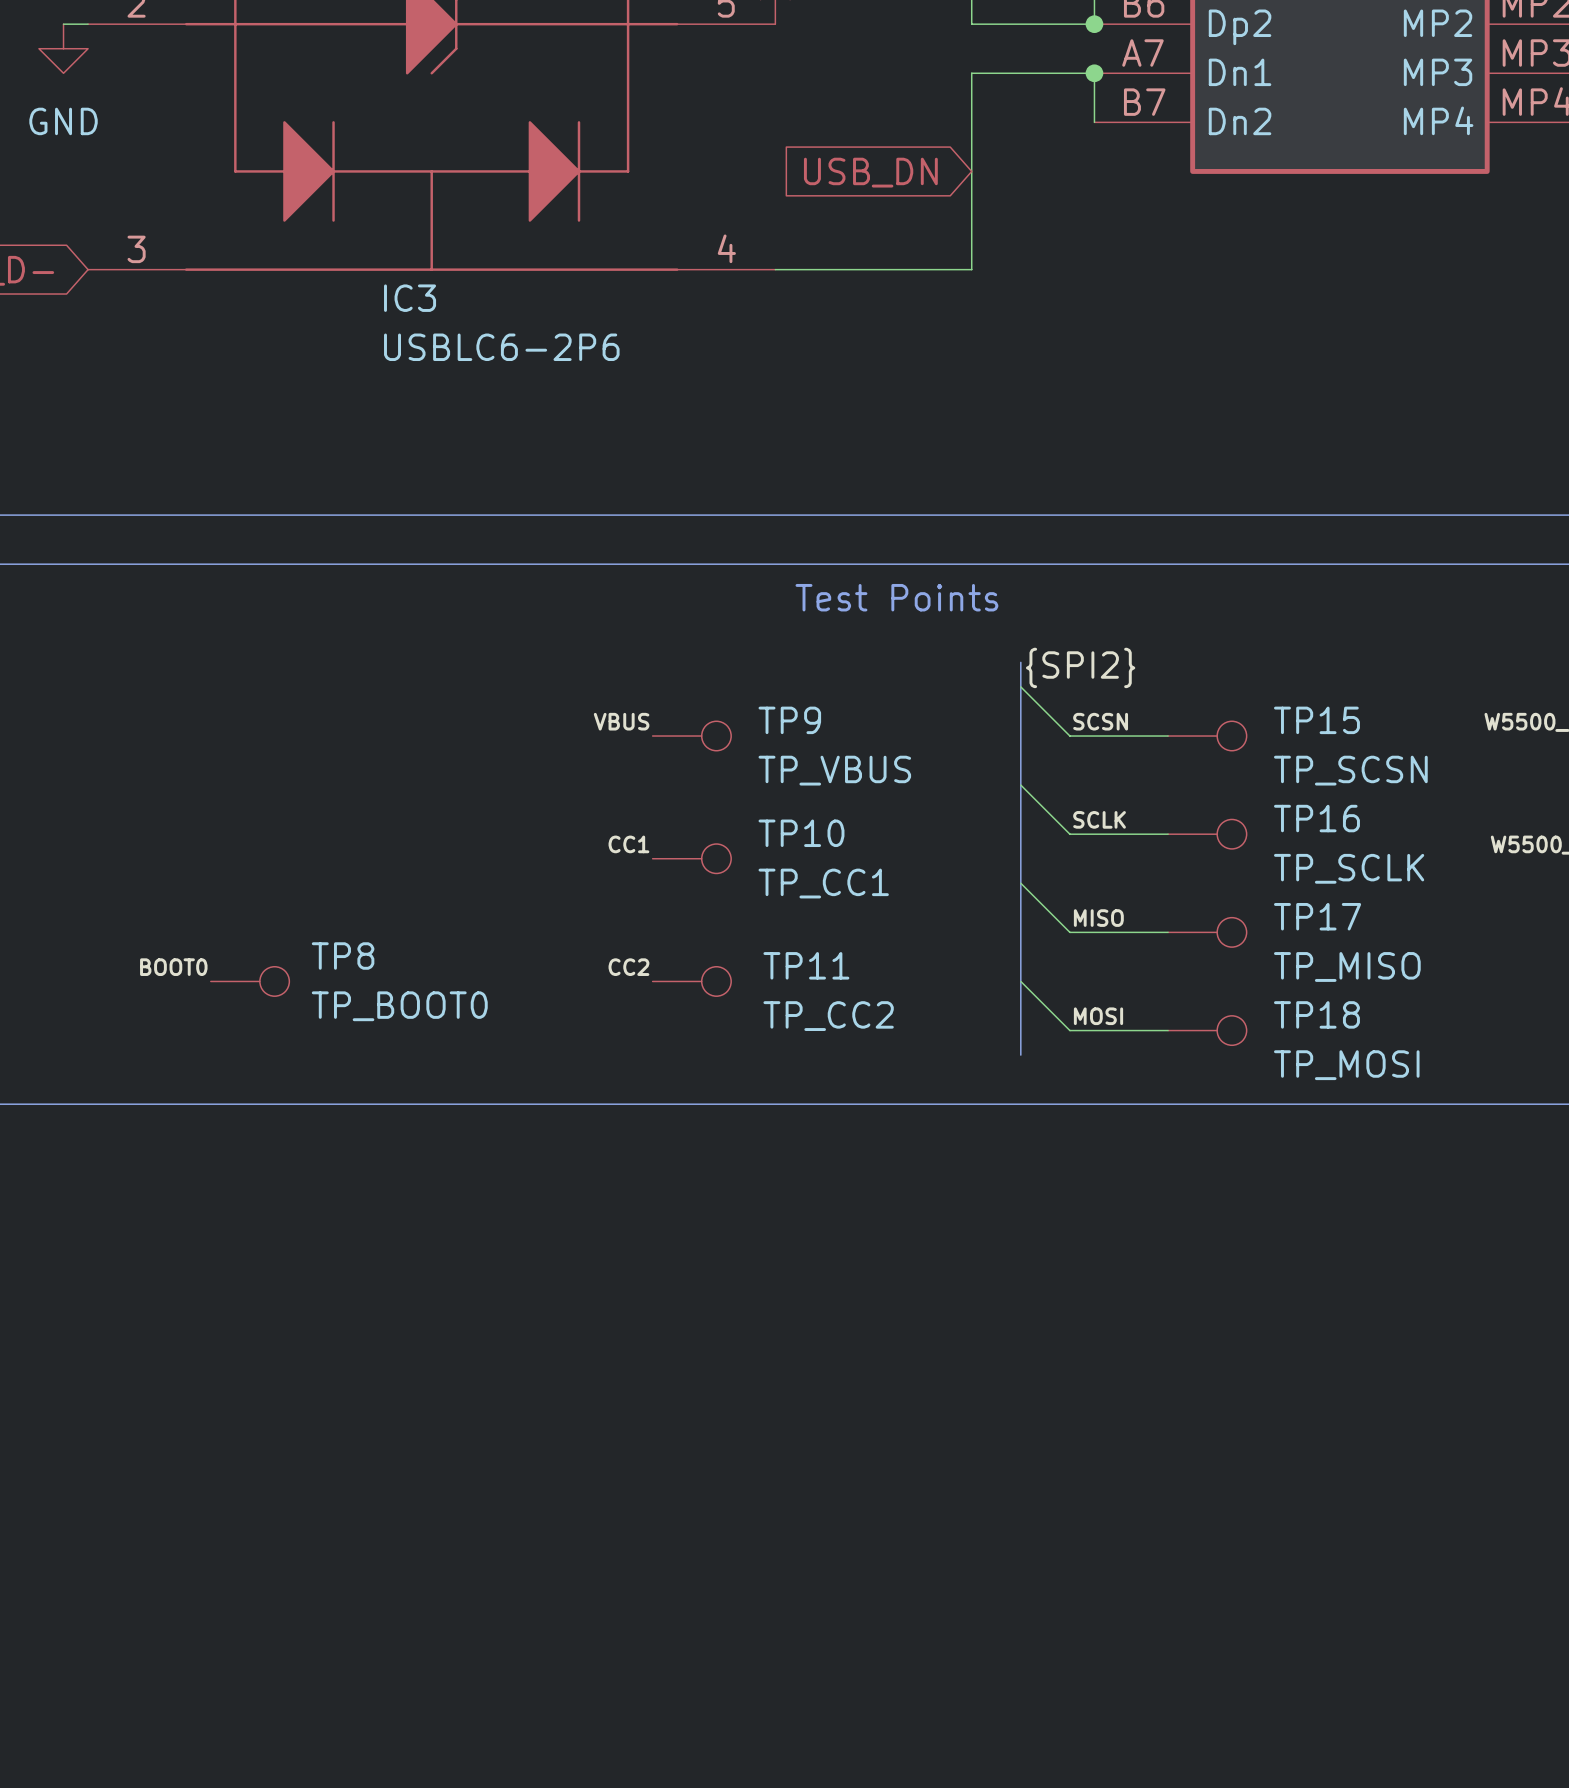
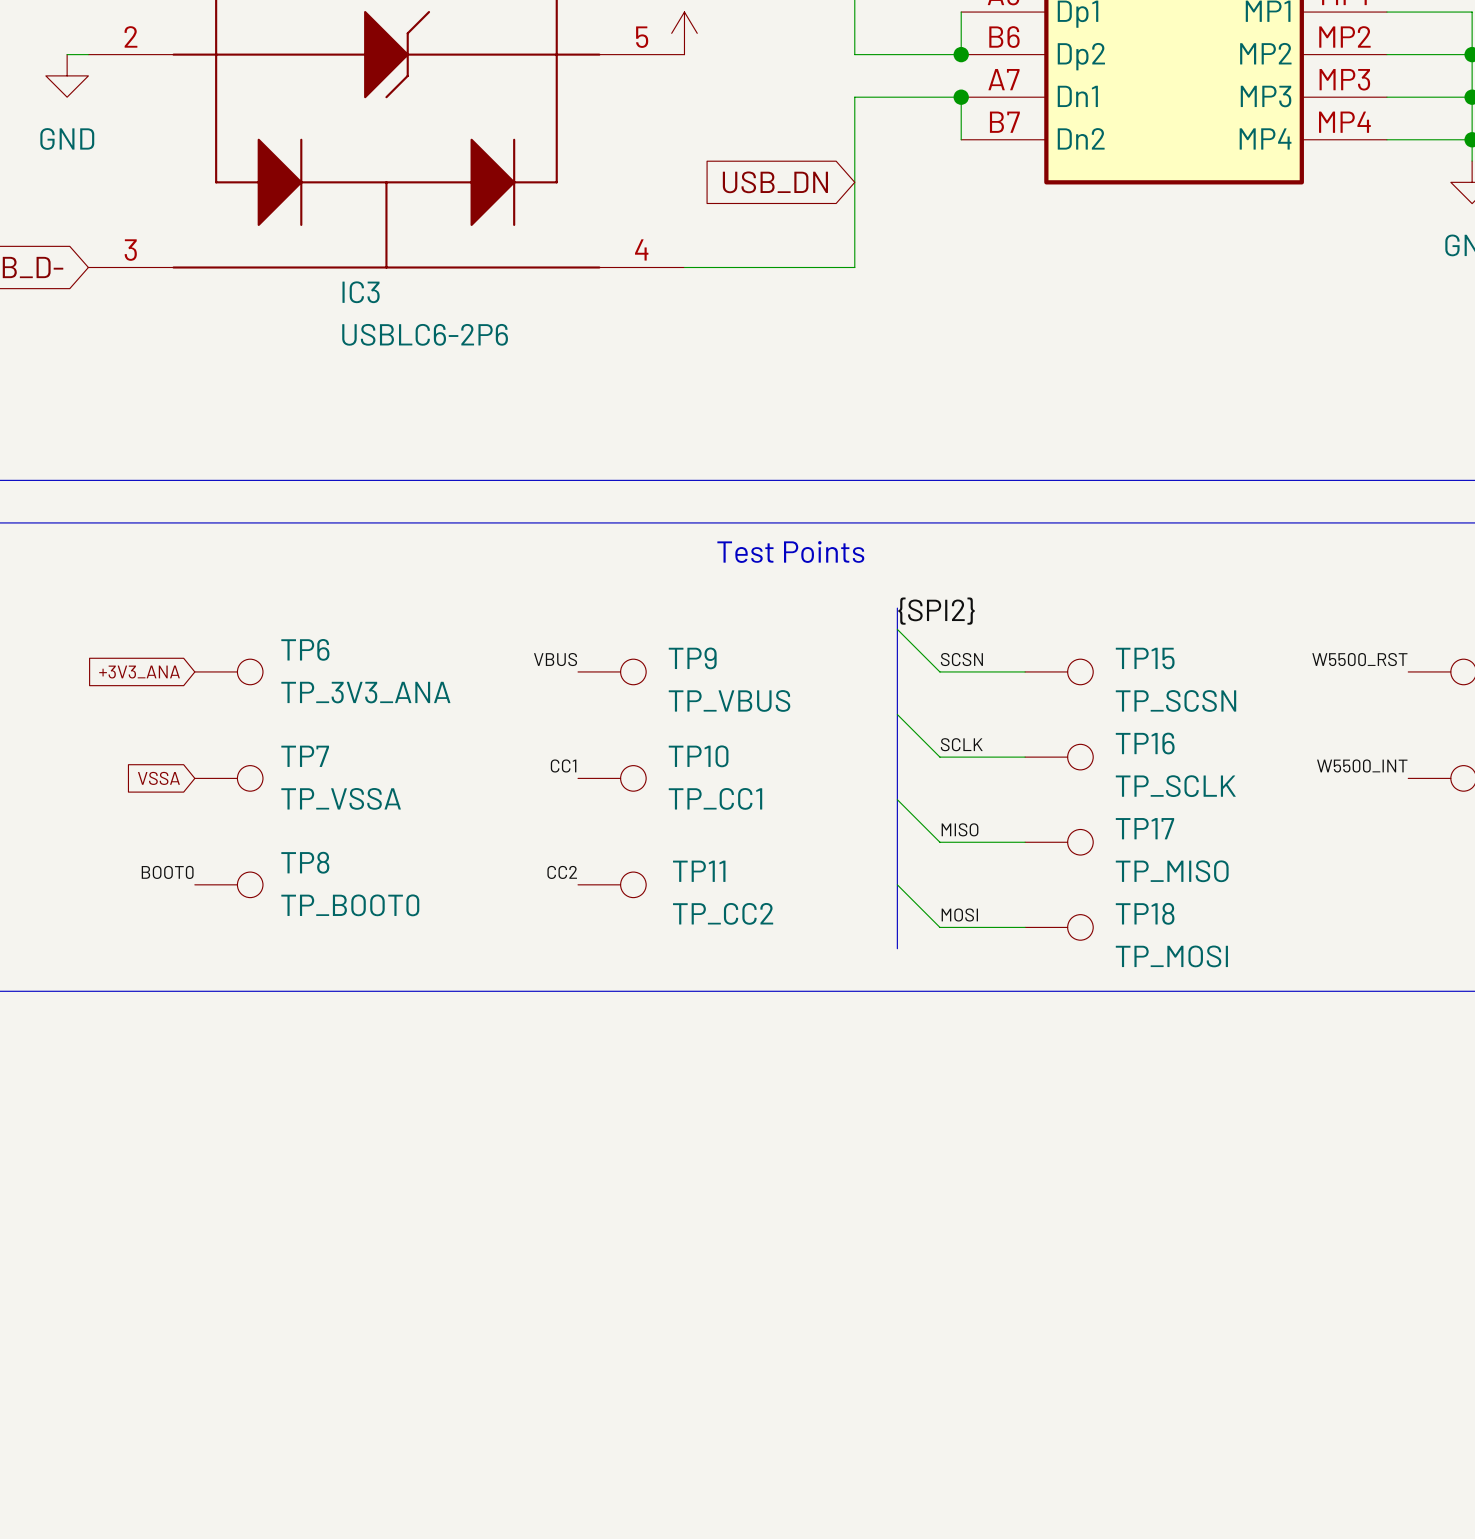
global label: none -> +3V3_ANA (139, 672)
TP6: none -> TP_3V3_ANA (228, 671)
global label: none -> VSSA (158, 778)
TP7: none -> TP_VSSA (228, 778)

